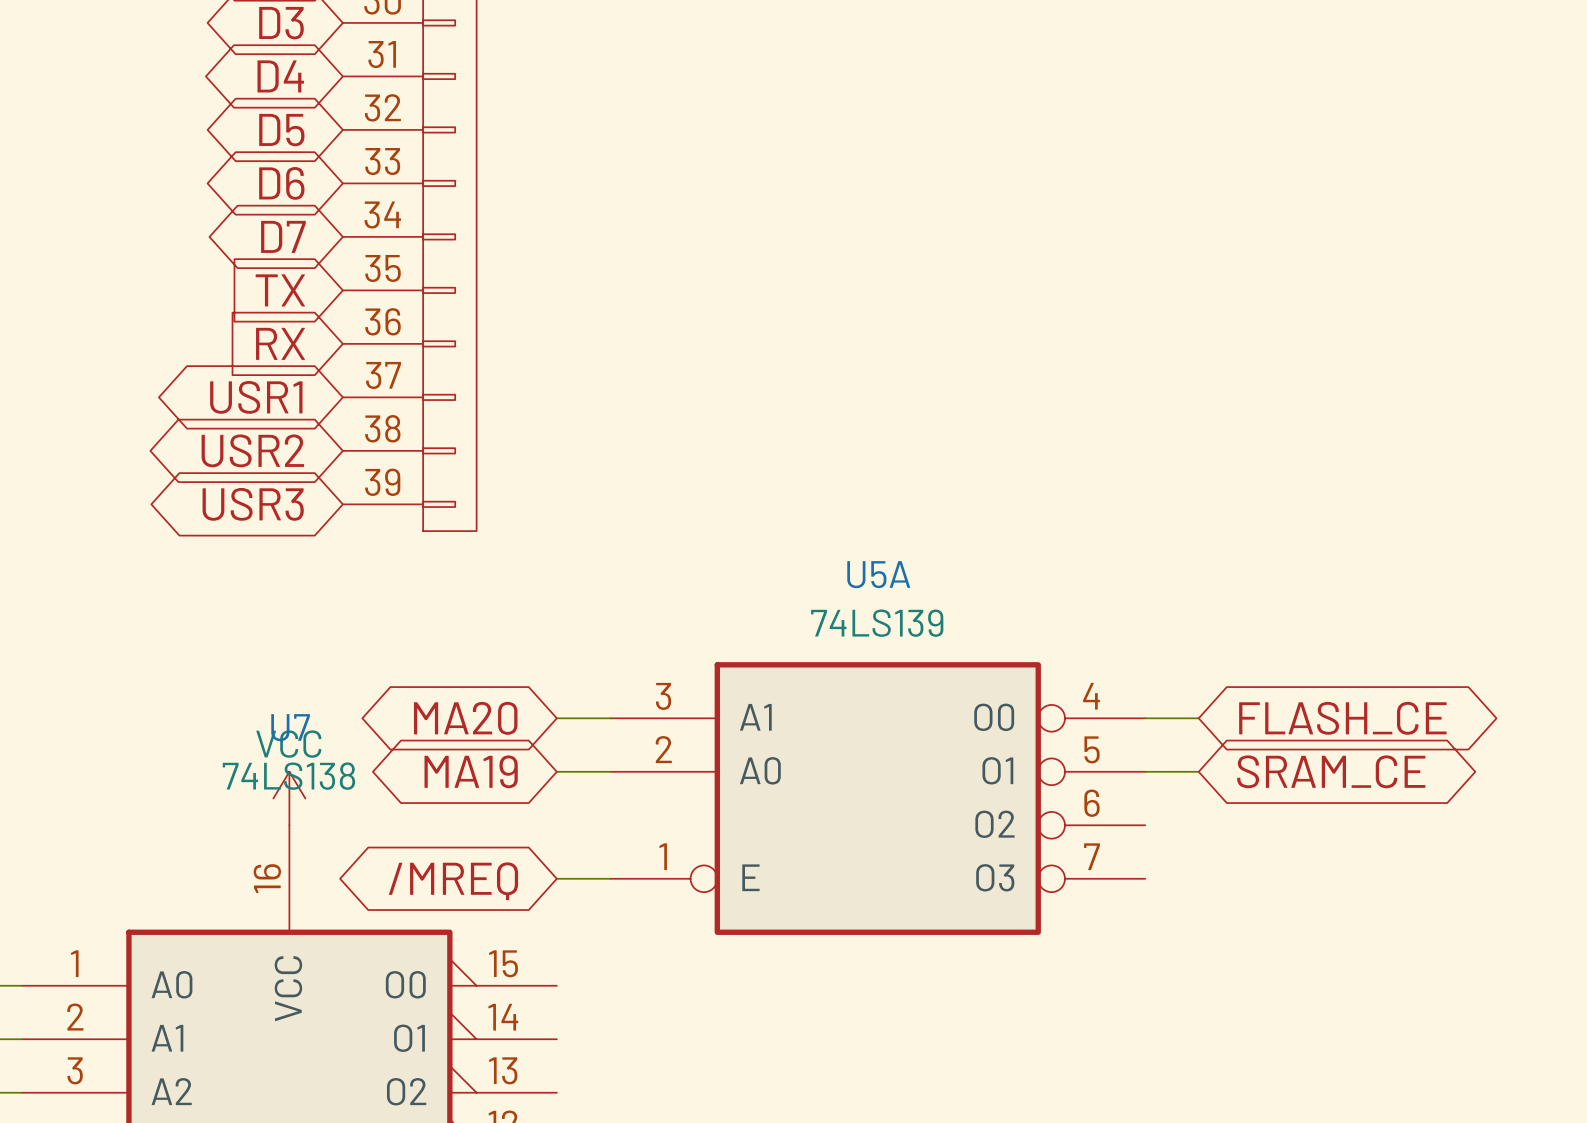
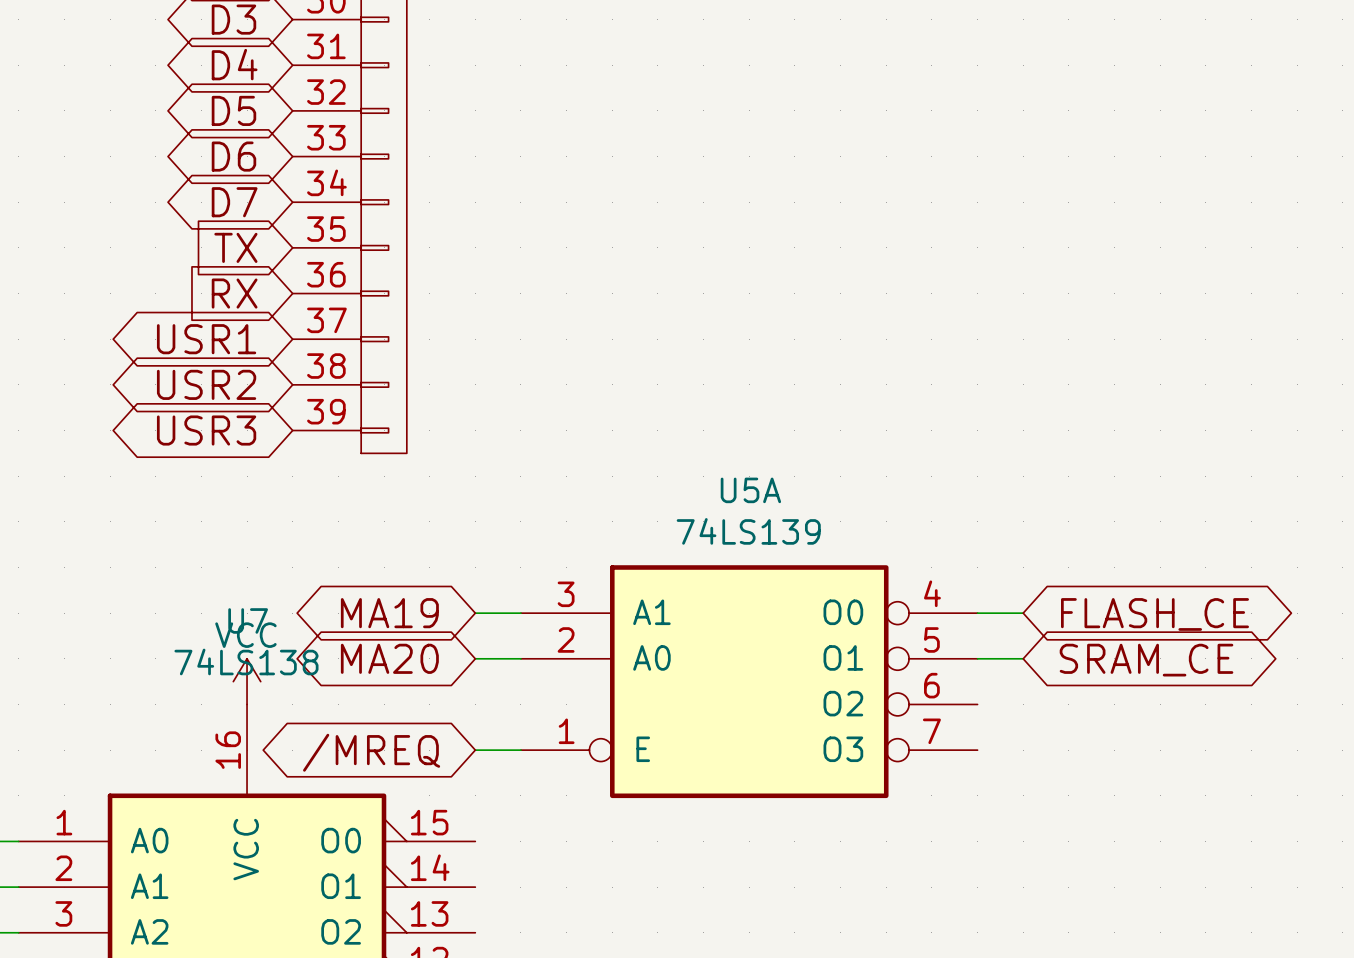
global label: MA20 (465, 718) -> MA19 (389, 613)
global label: MA19 (471, 771) -> MA20 (389, 658)

